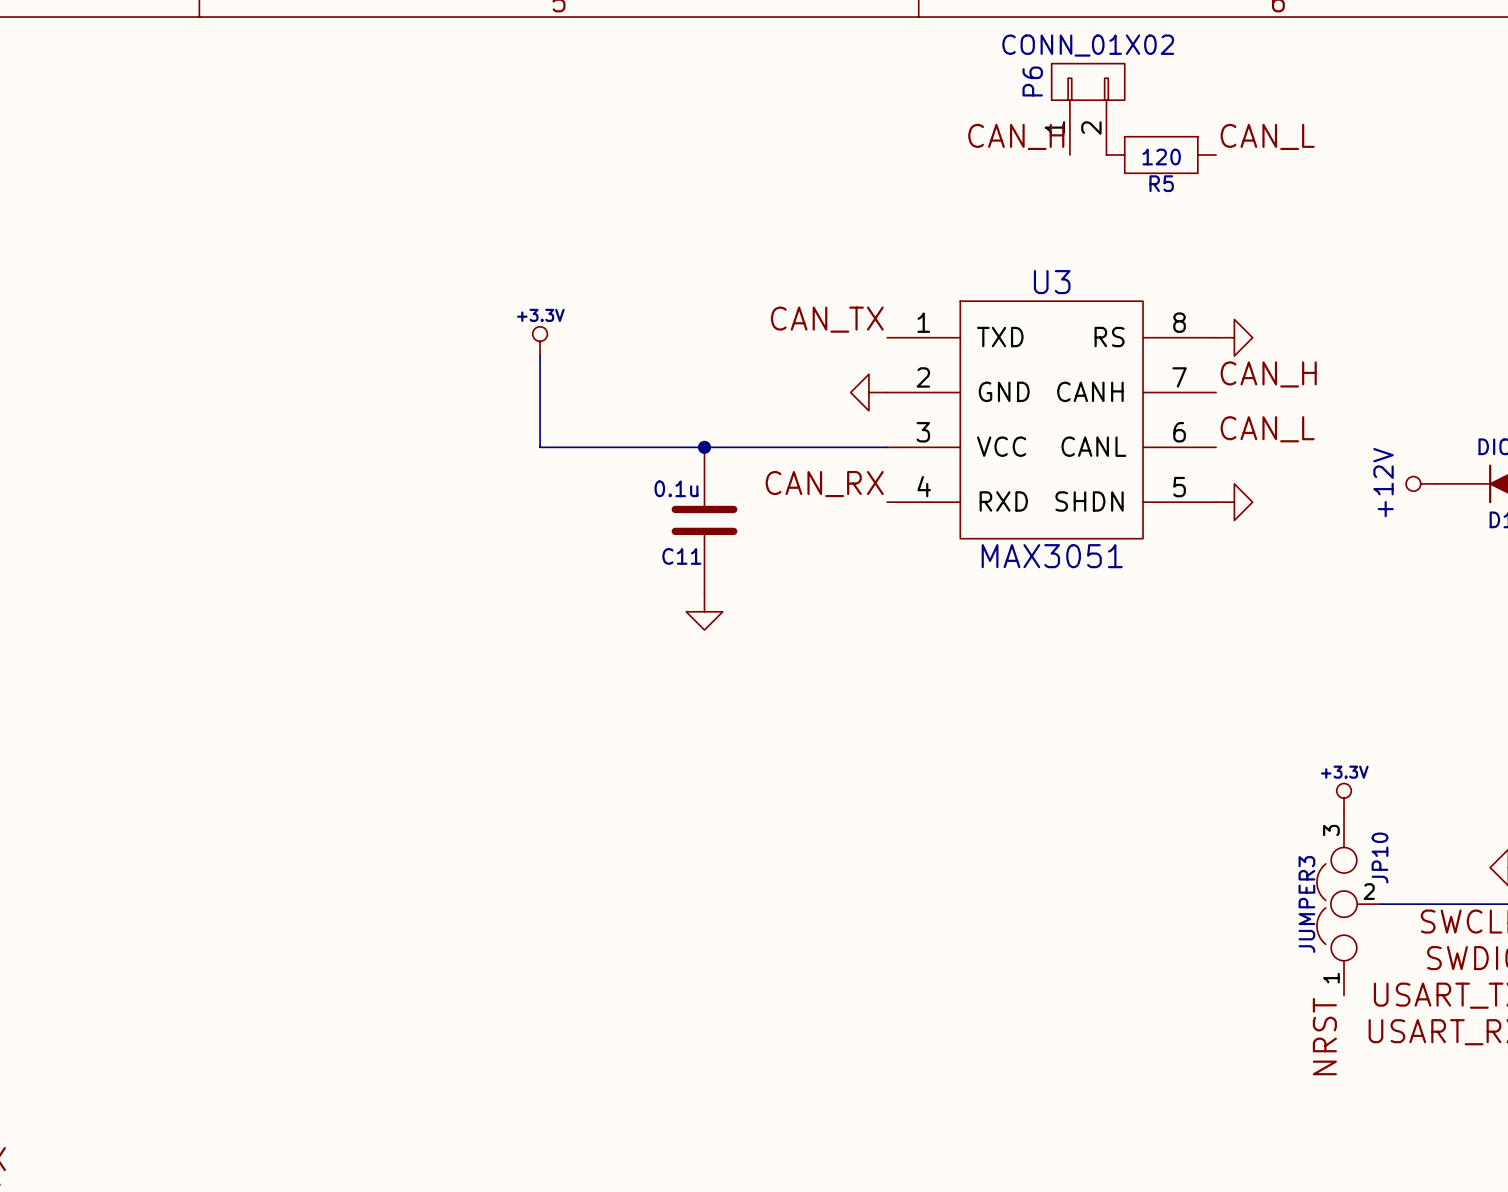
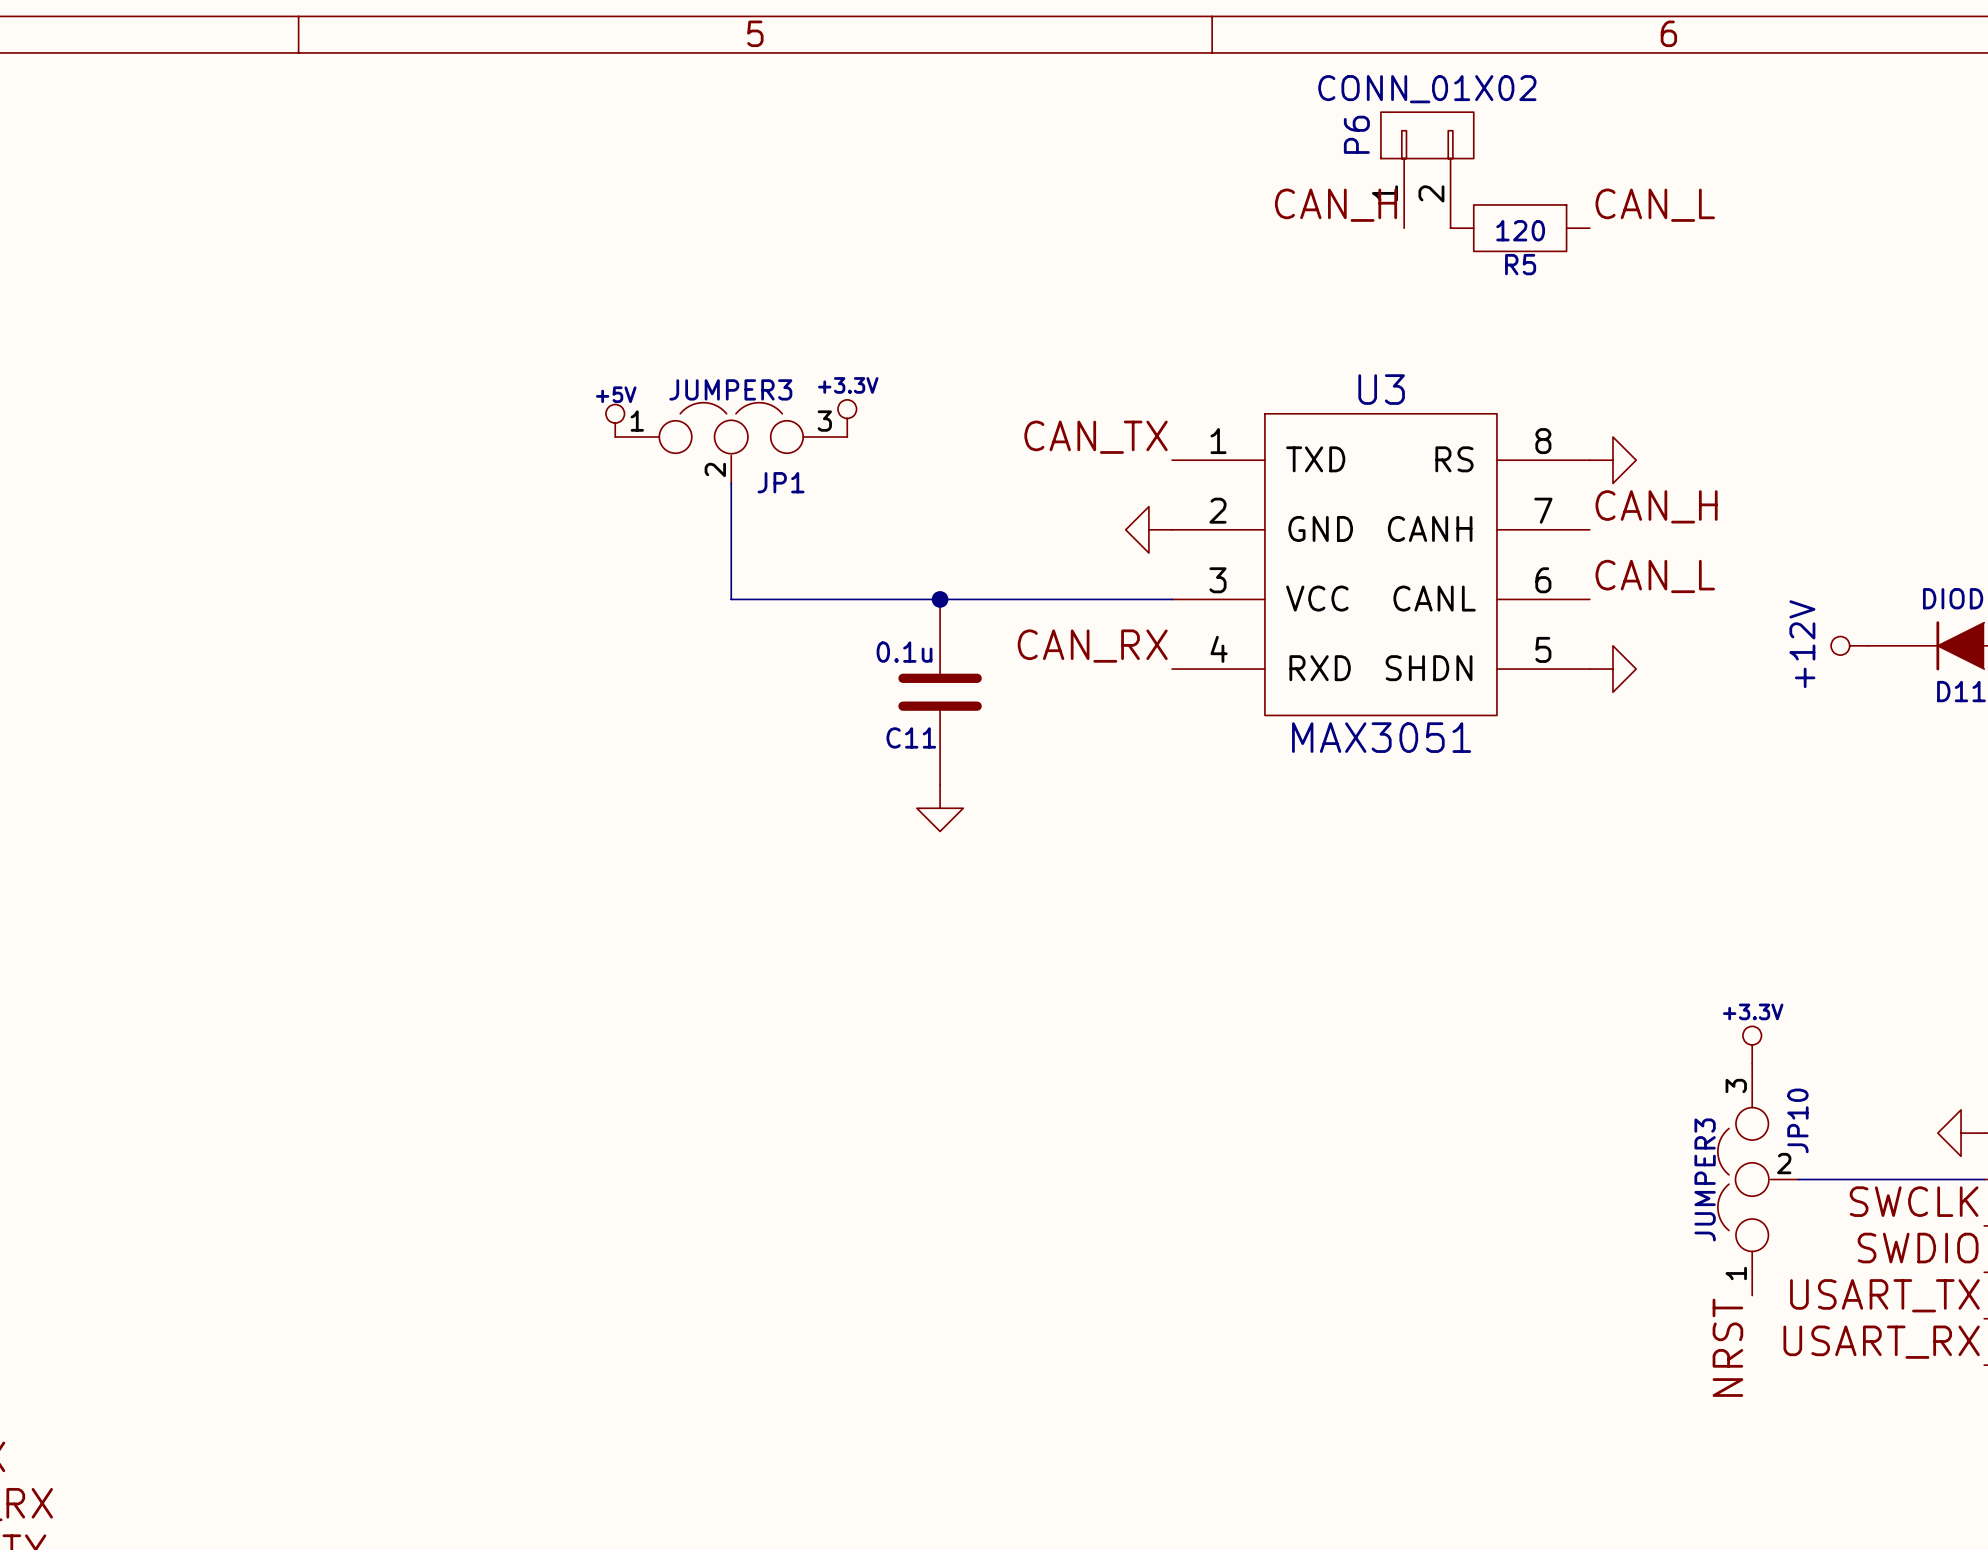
power symbol: none -> +5V (615, 420)
JP1: none -> JUMPER3 (731, 443)
power symbol position: +3.3V (540, 341) -> +3.3V (847, 418)

